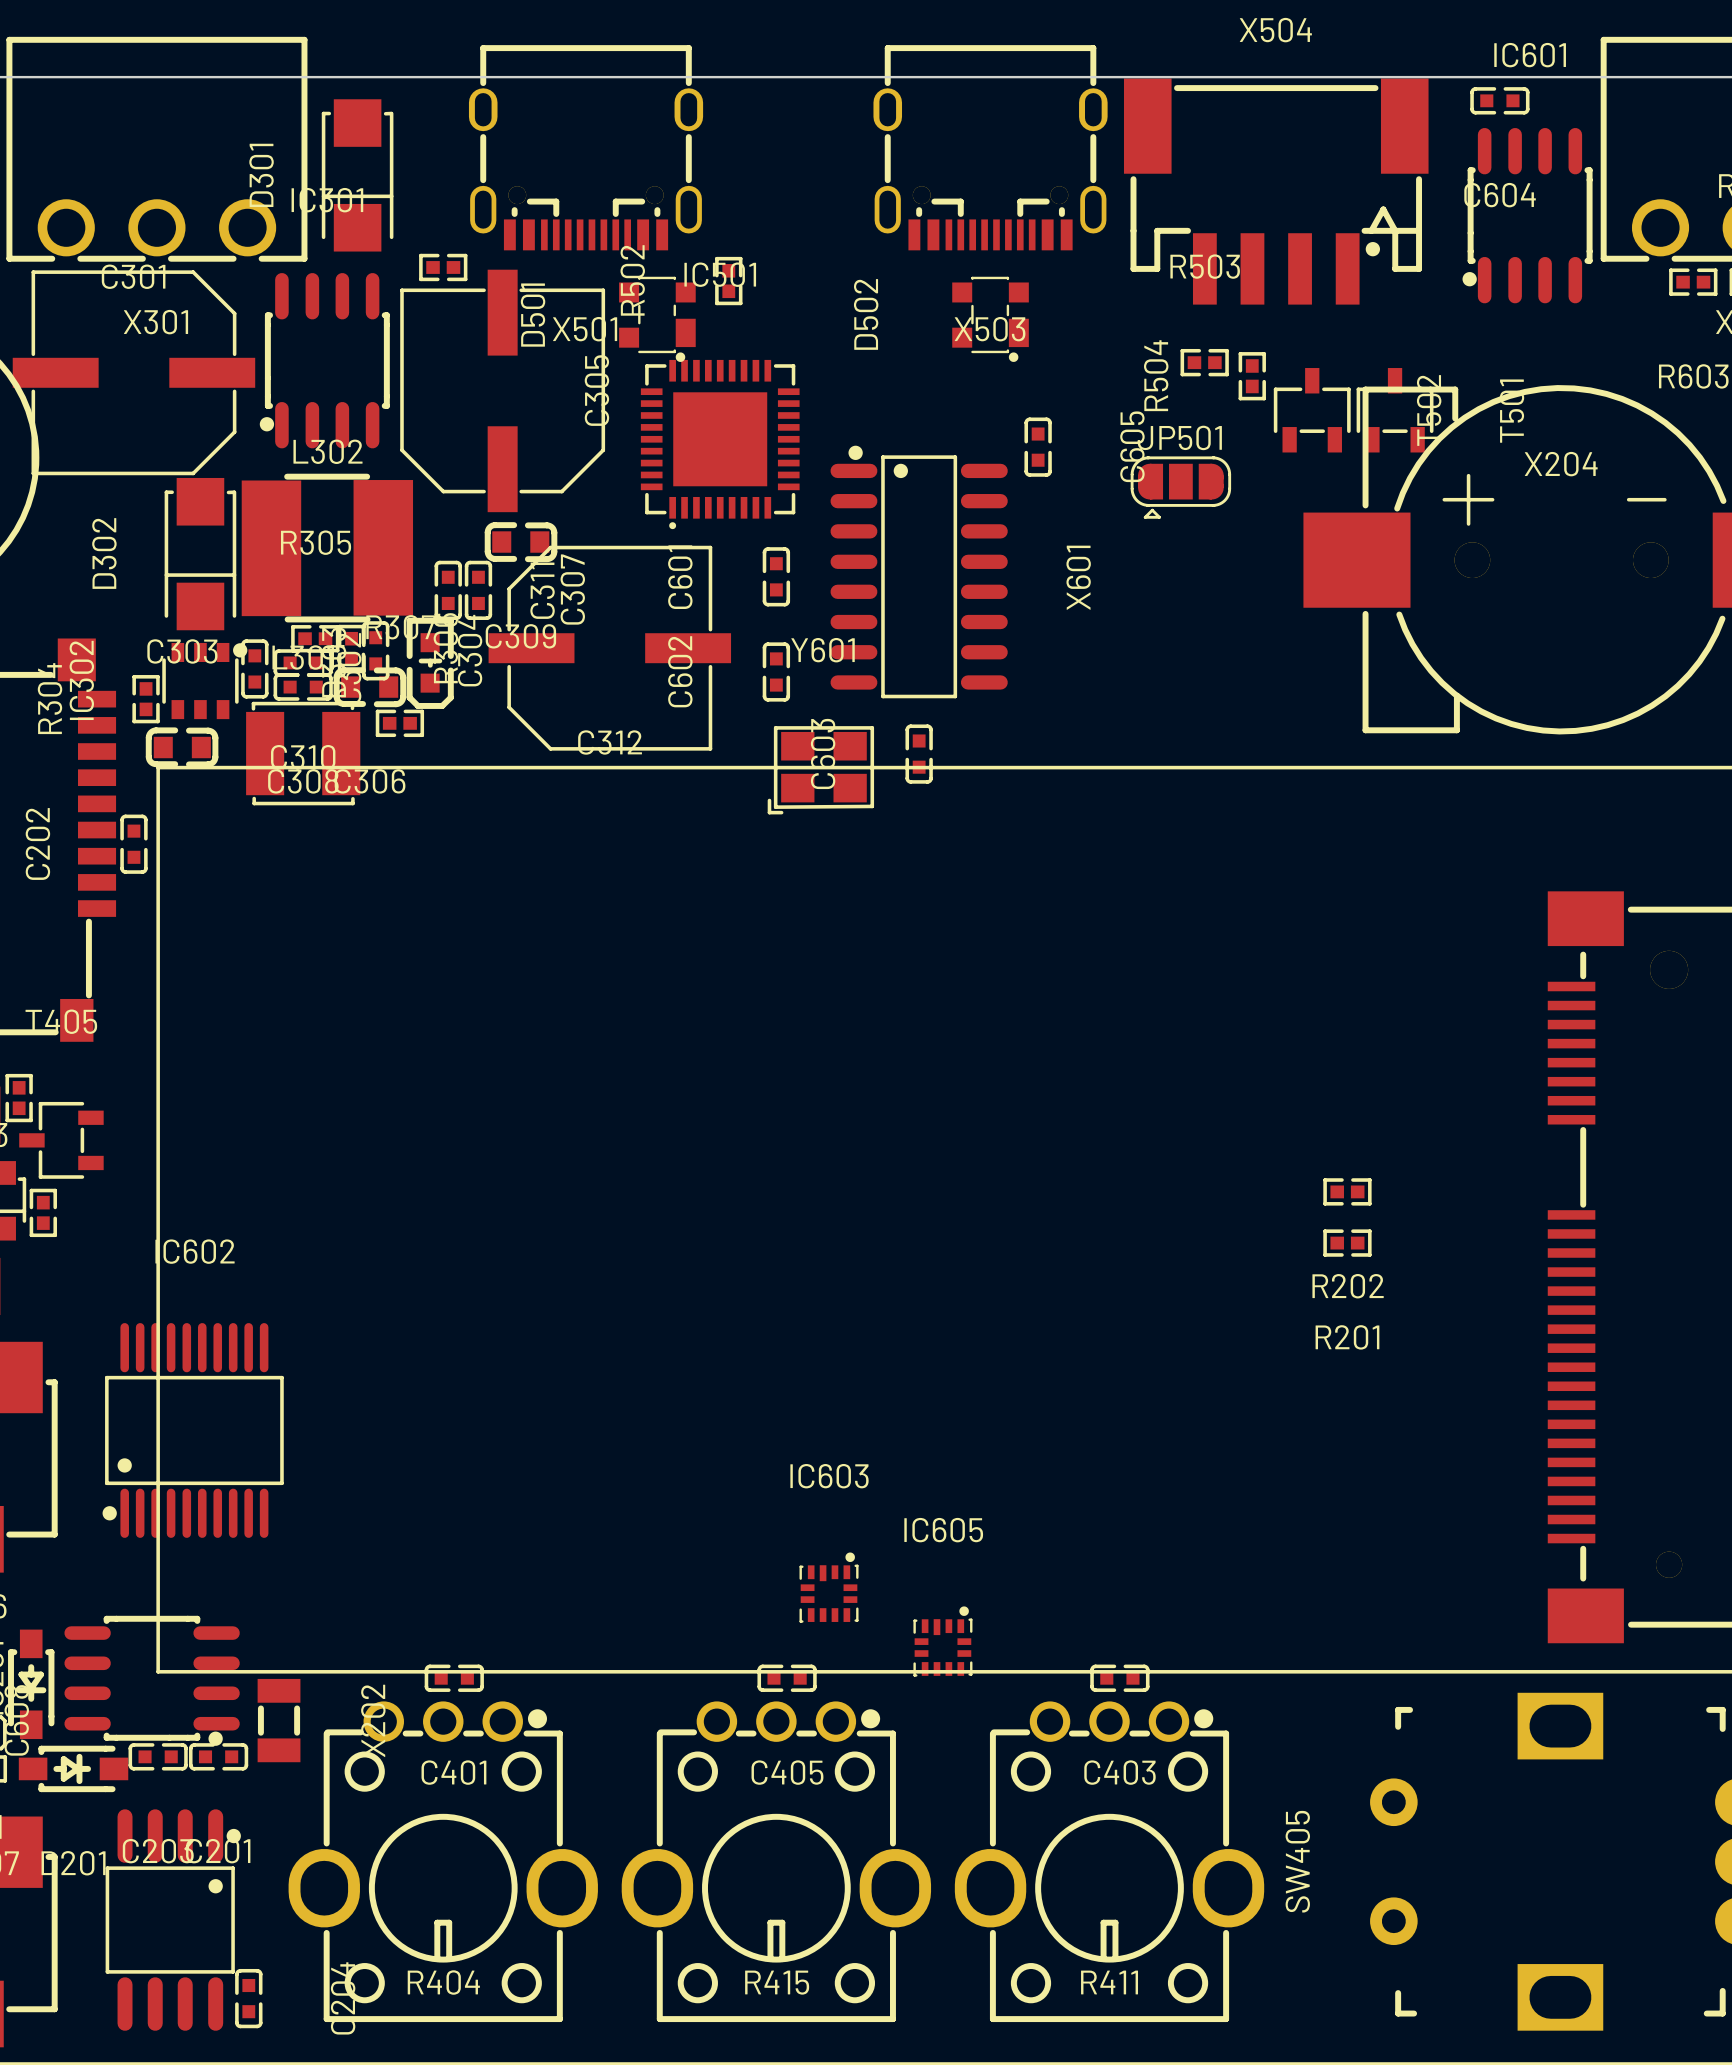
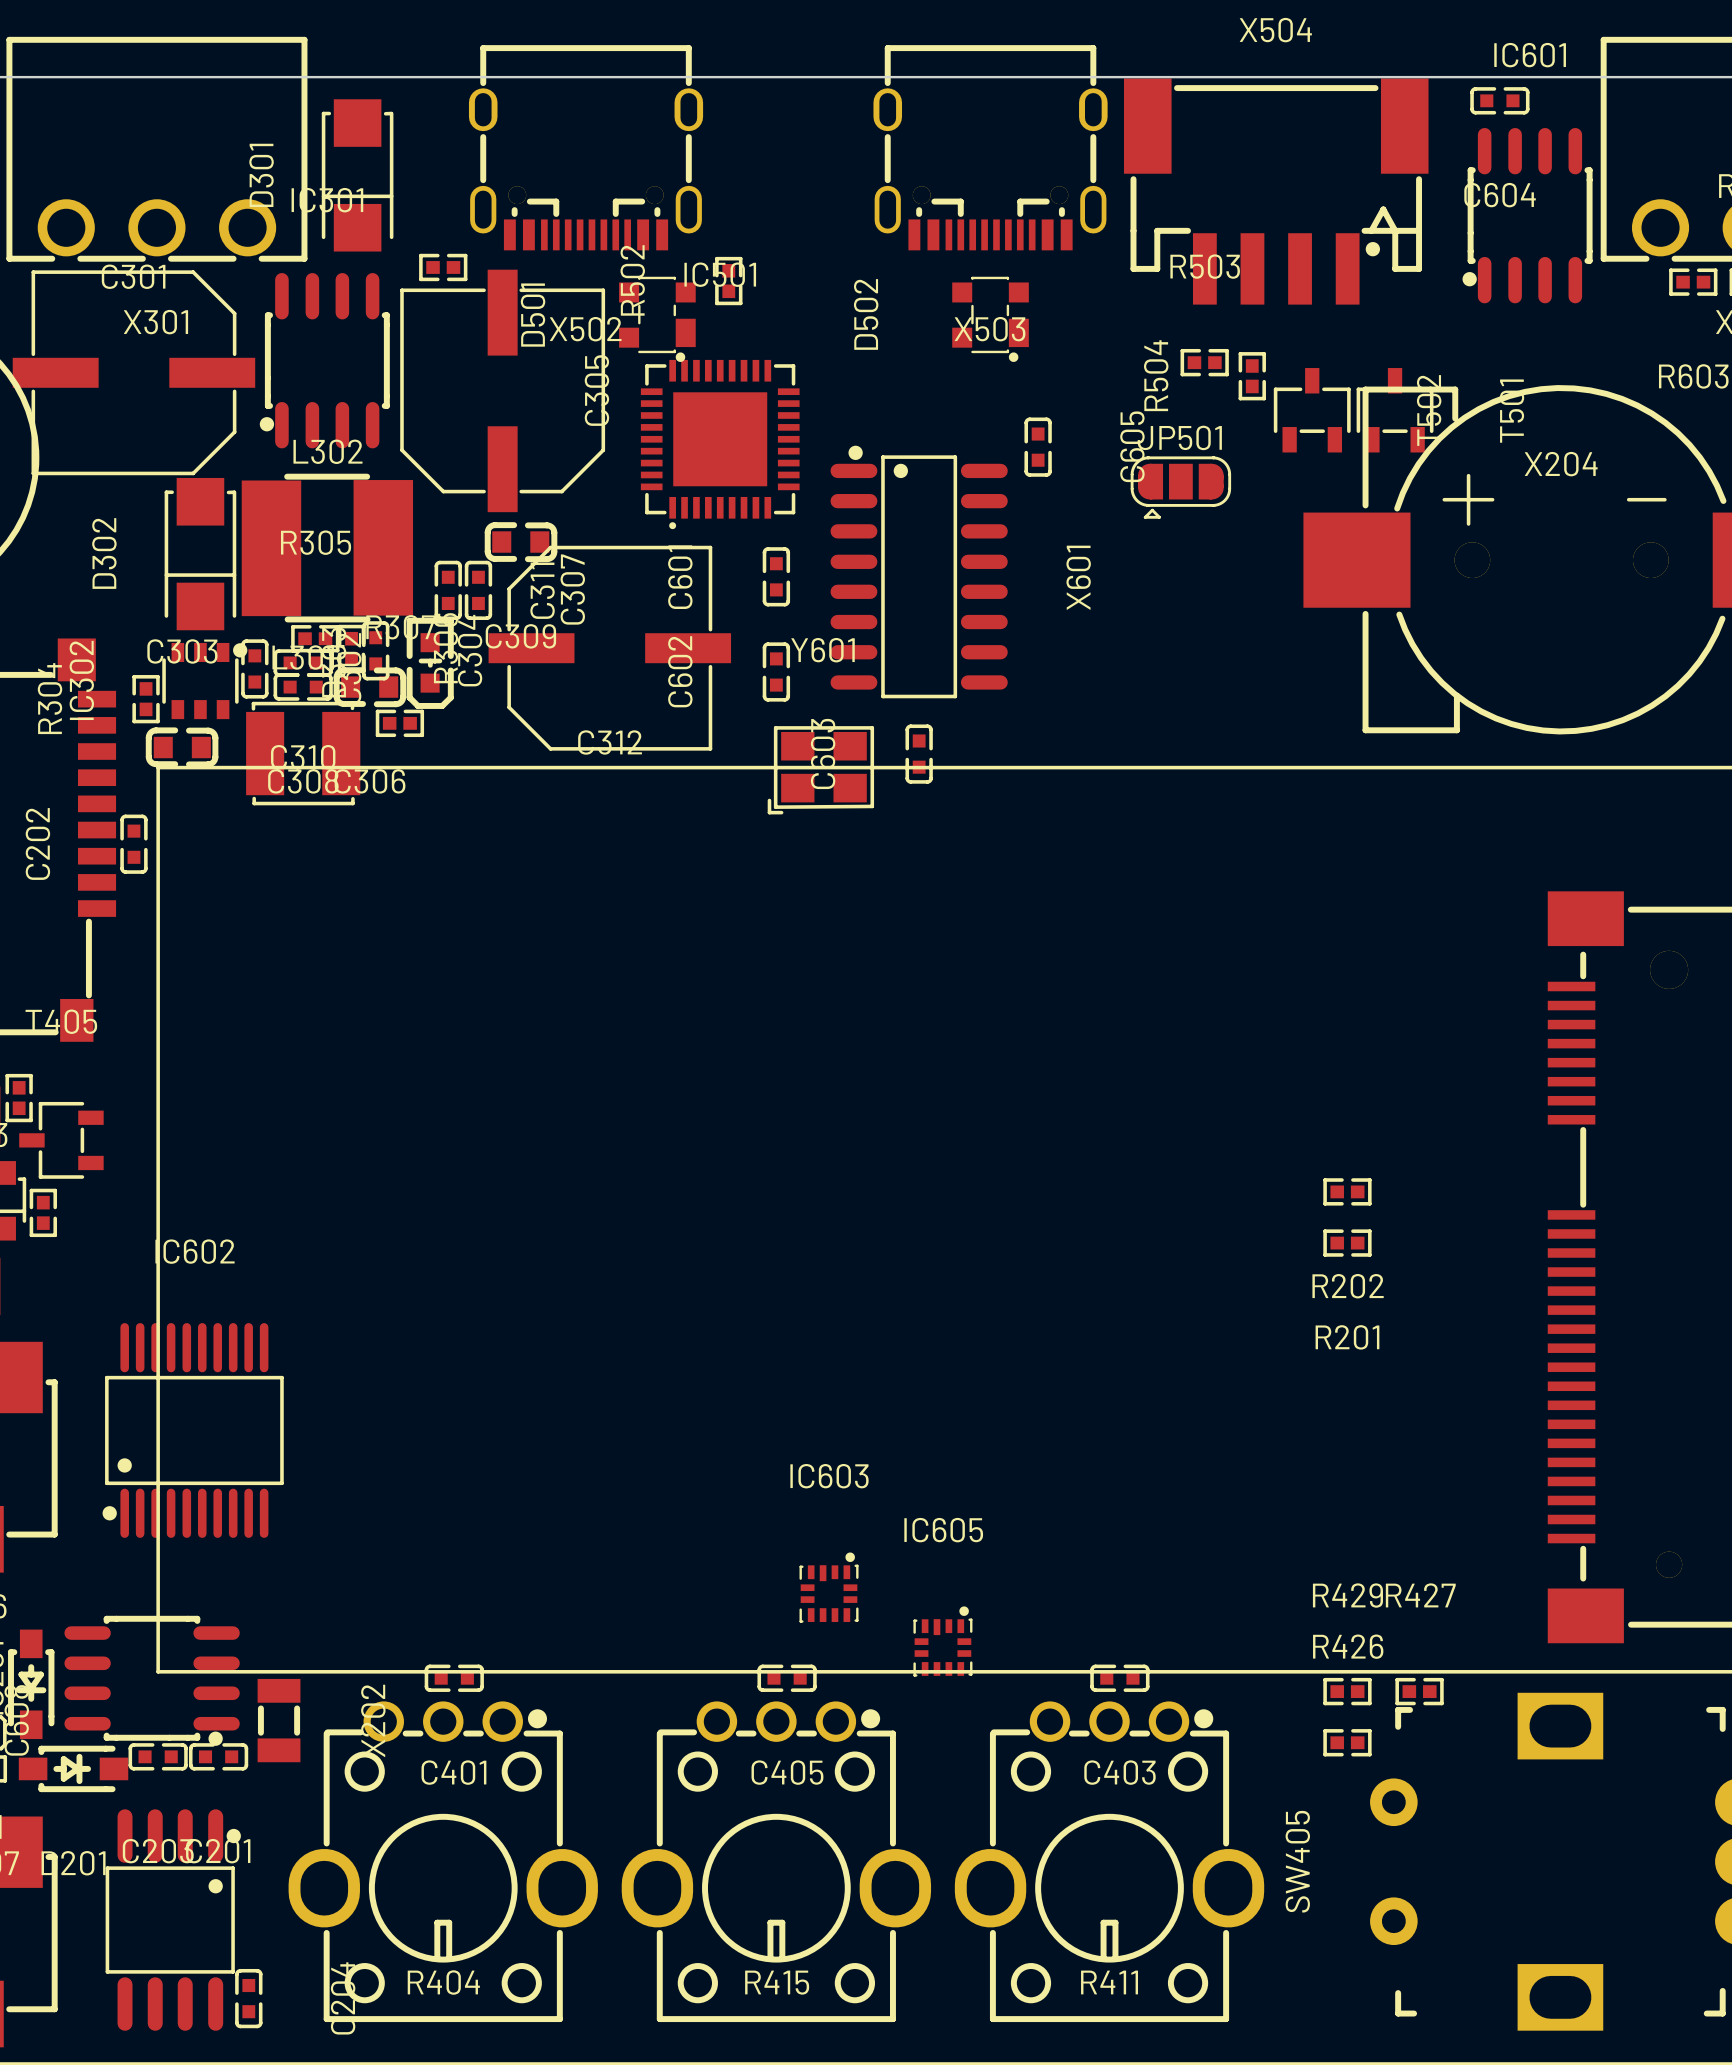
X501 name: X501 (585, 329) -> X502 (585, 329)
R429: none -> (1347, 1691)
R427: none -> (1419, 1691)
R426: none -> (1347, 1742)

